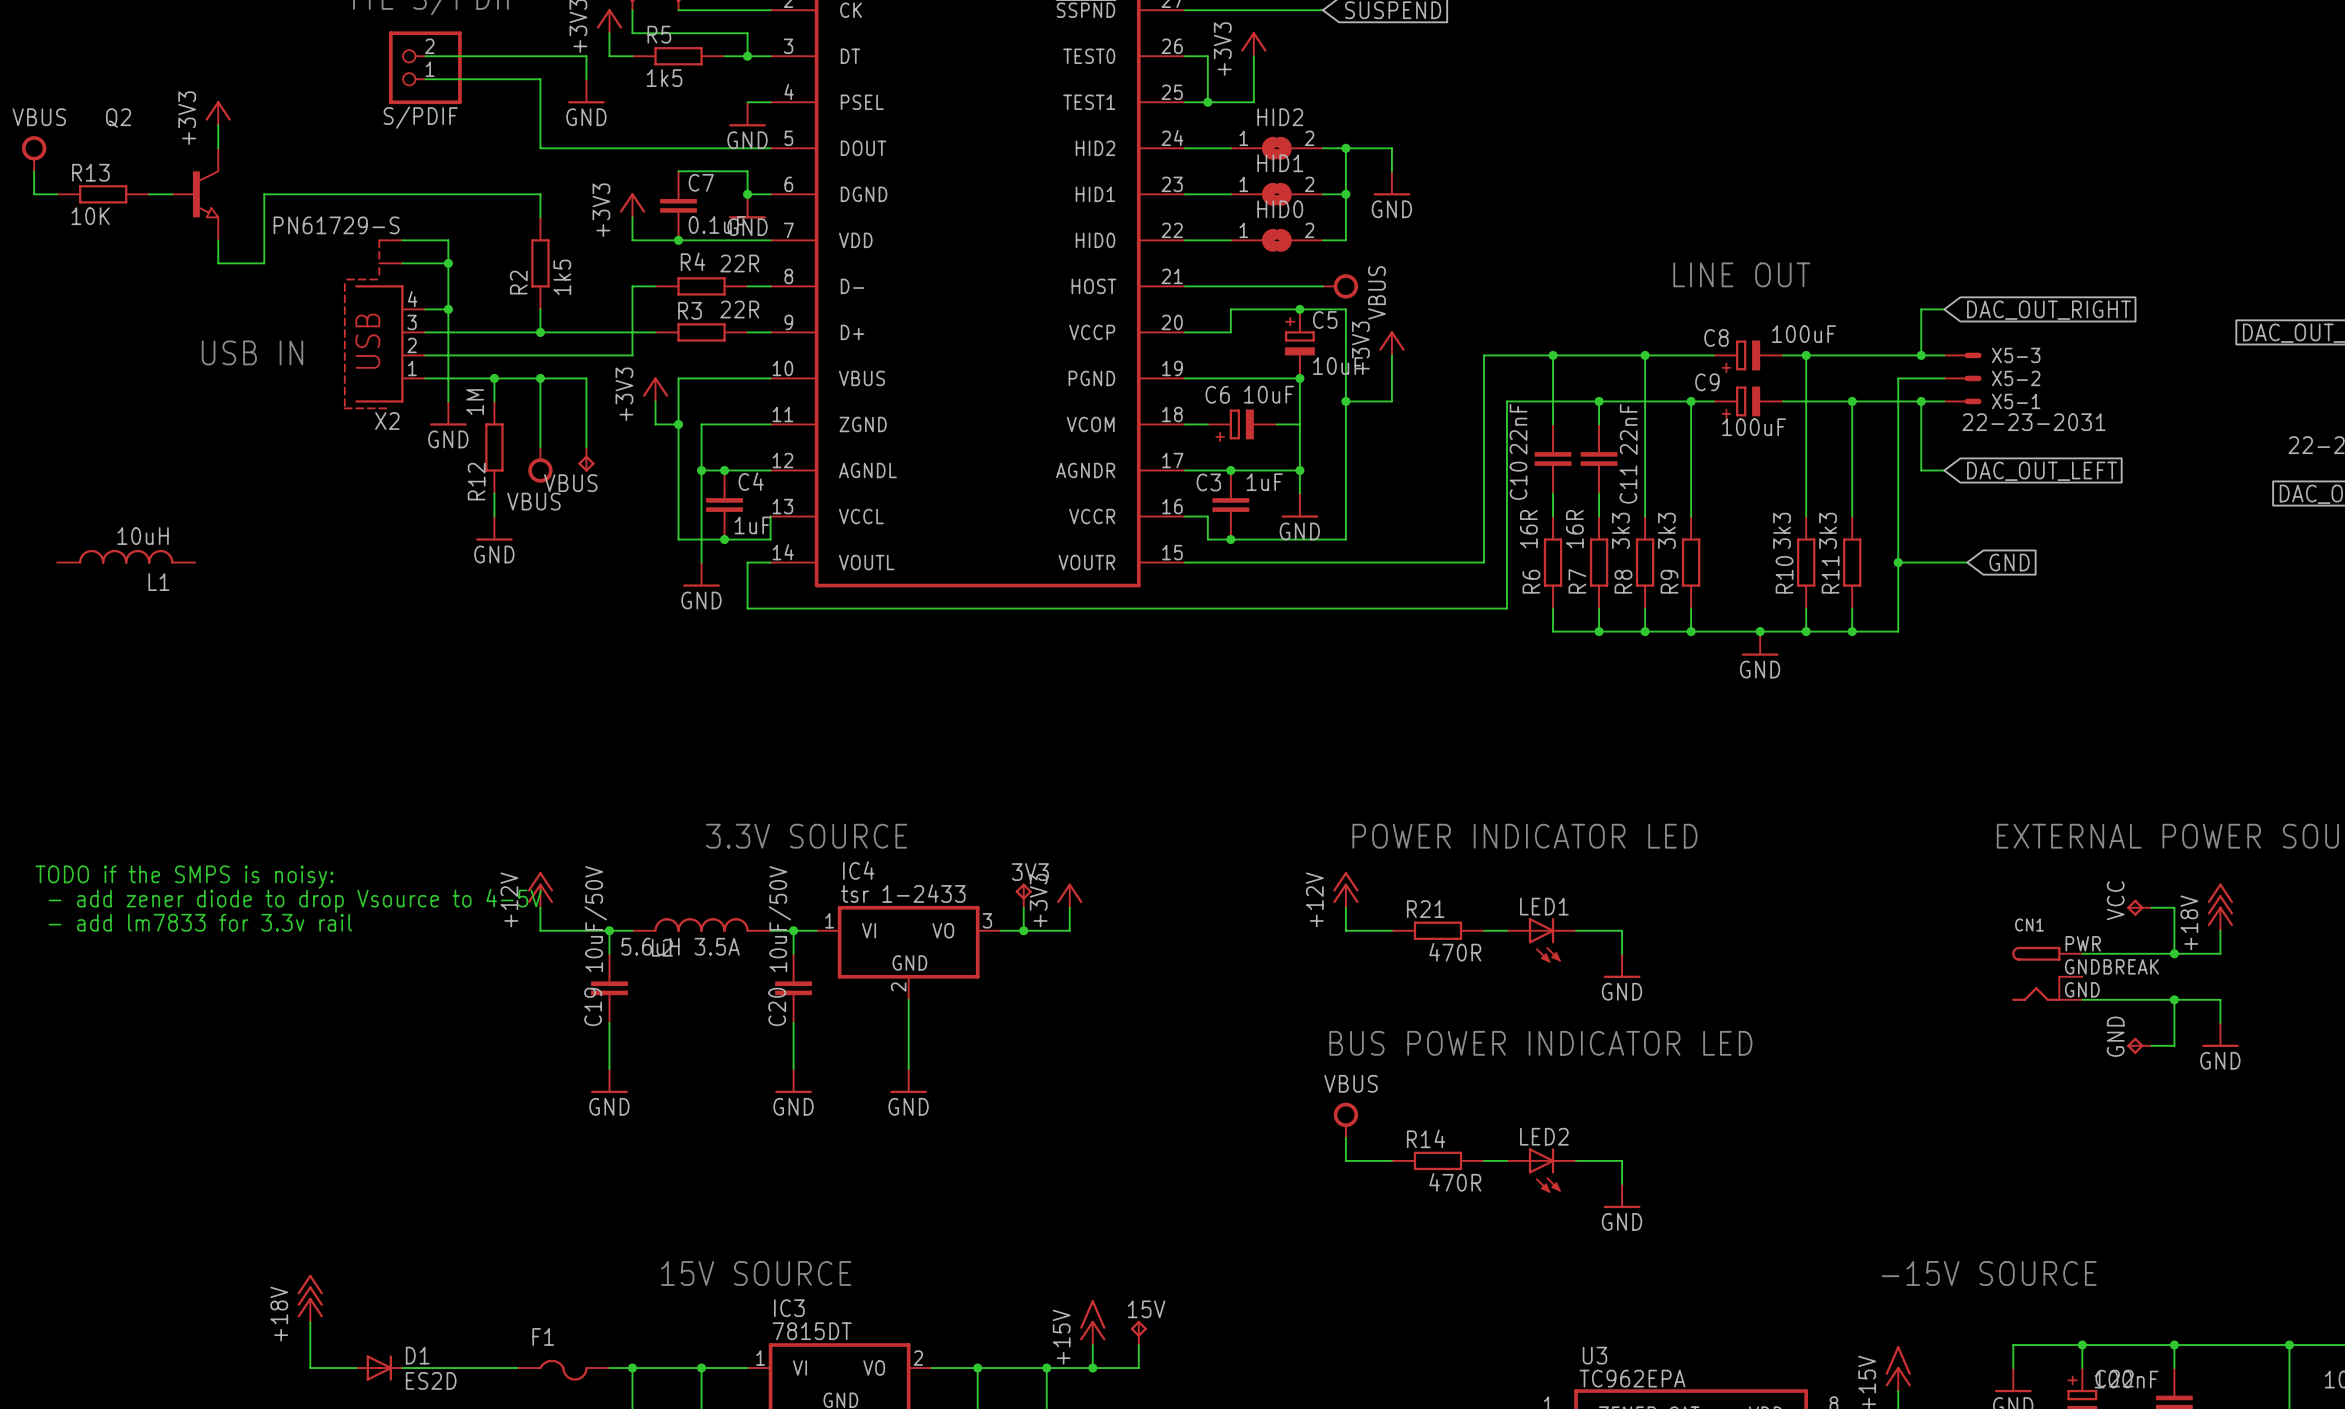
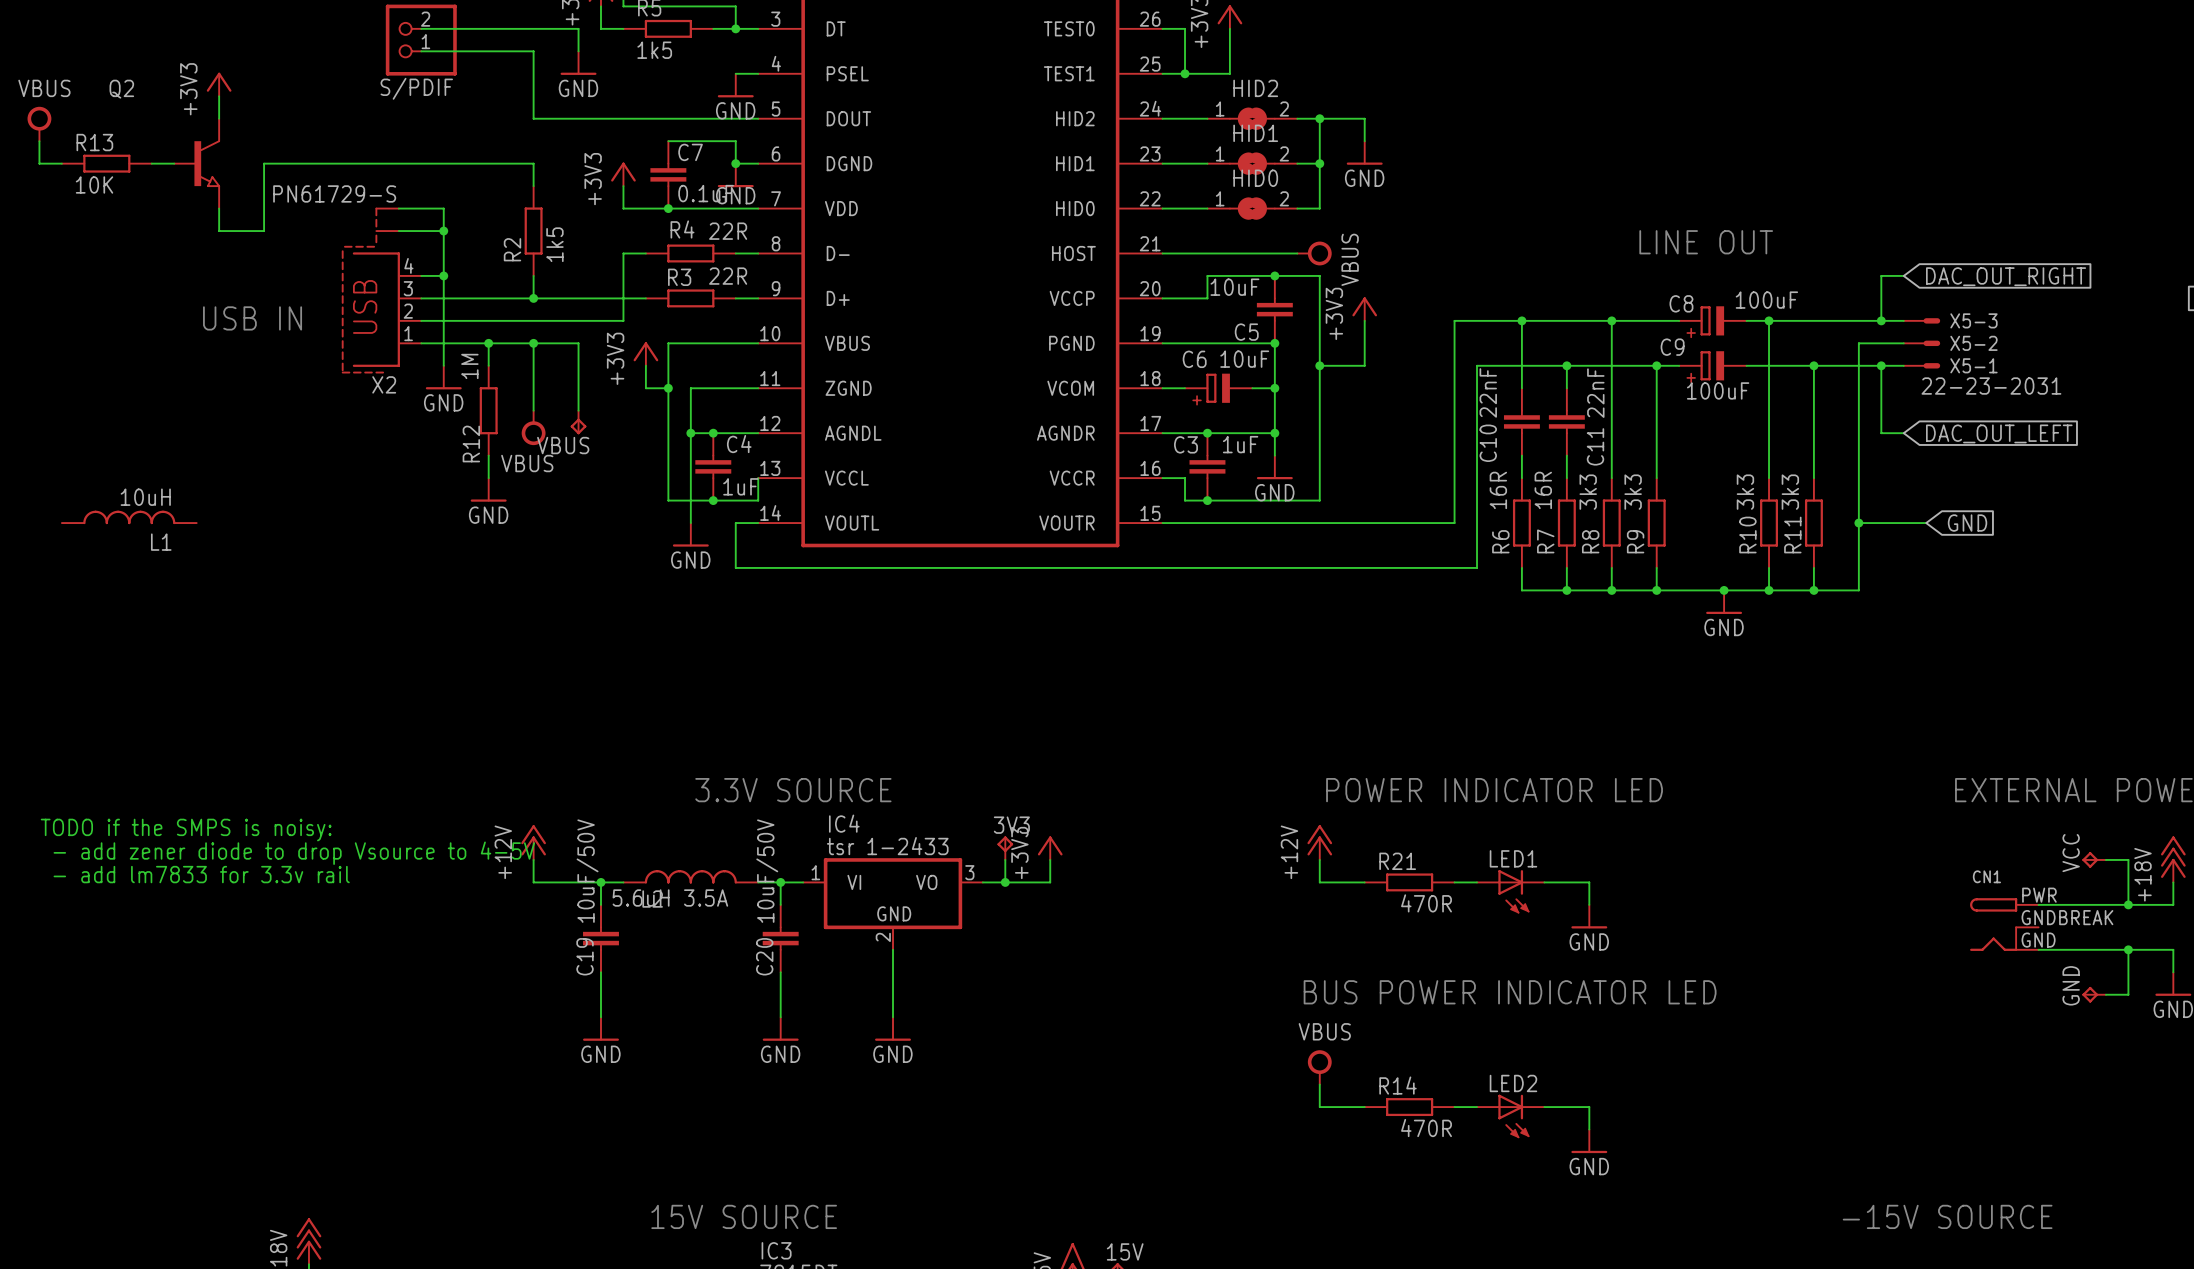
C5 symbol: [1284, 309, 1315, 379] -> [1256, 275, 1293, 344]
C5 name position: C5 (1325, 319) -> C5 (1246, 332)
C5 value position: 10uF (1338, 366) -> 10uF (1234, 287)
junction: none -> (1274, 388)

